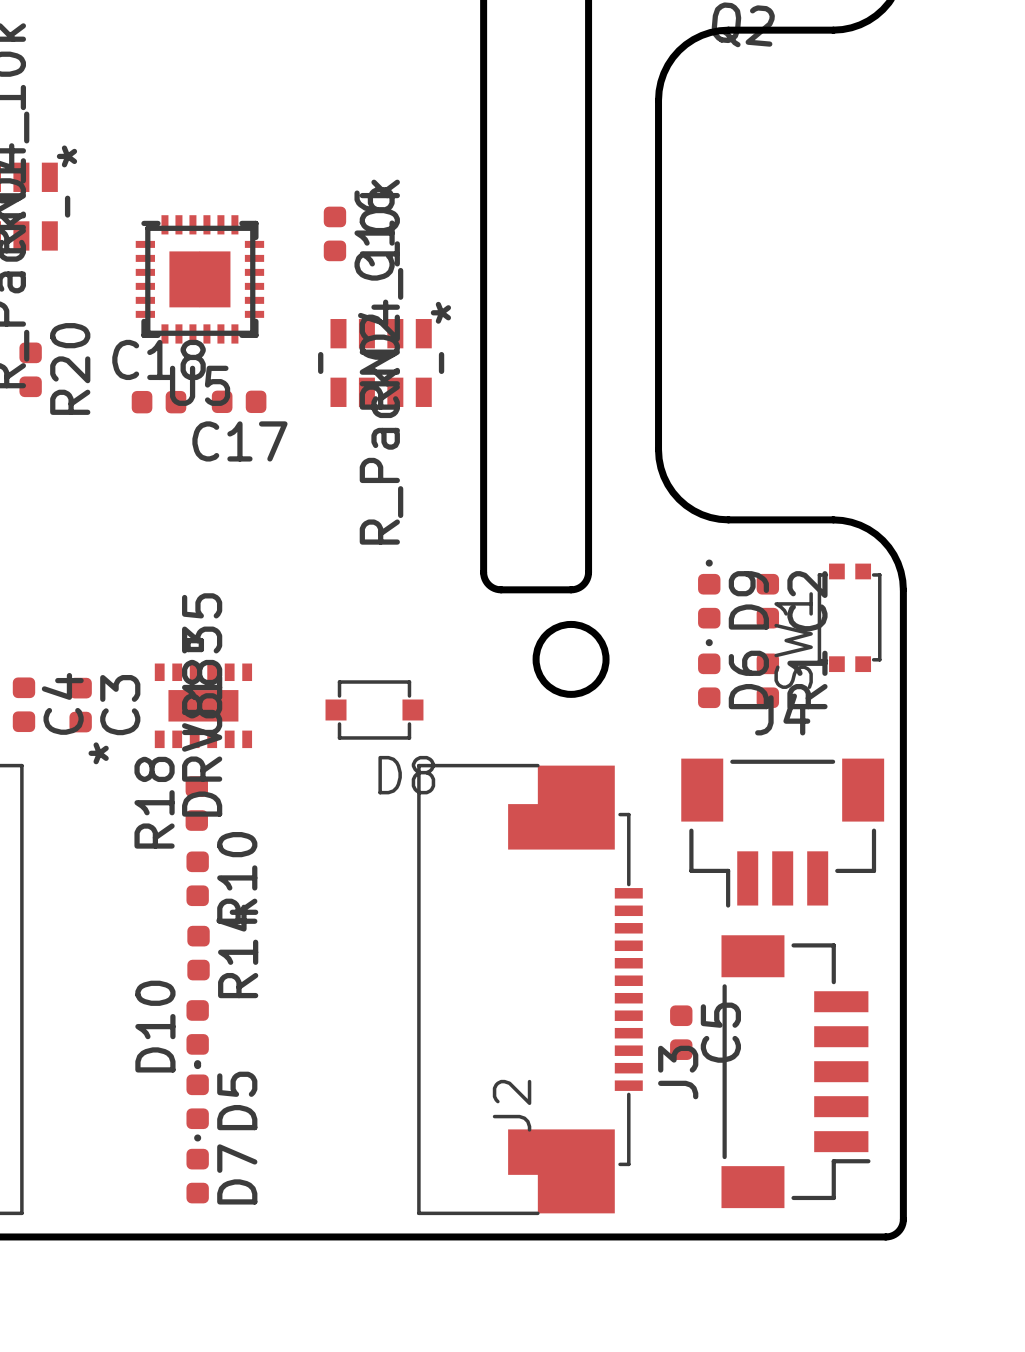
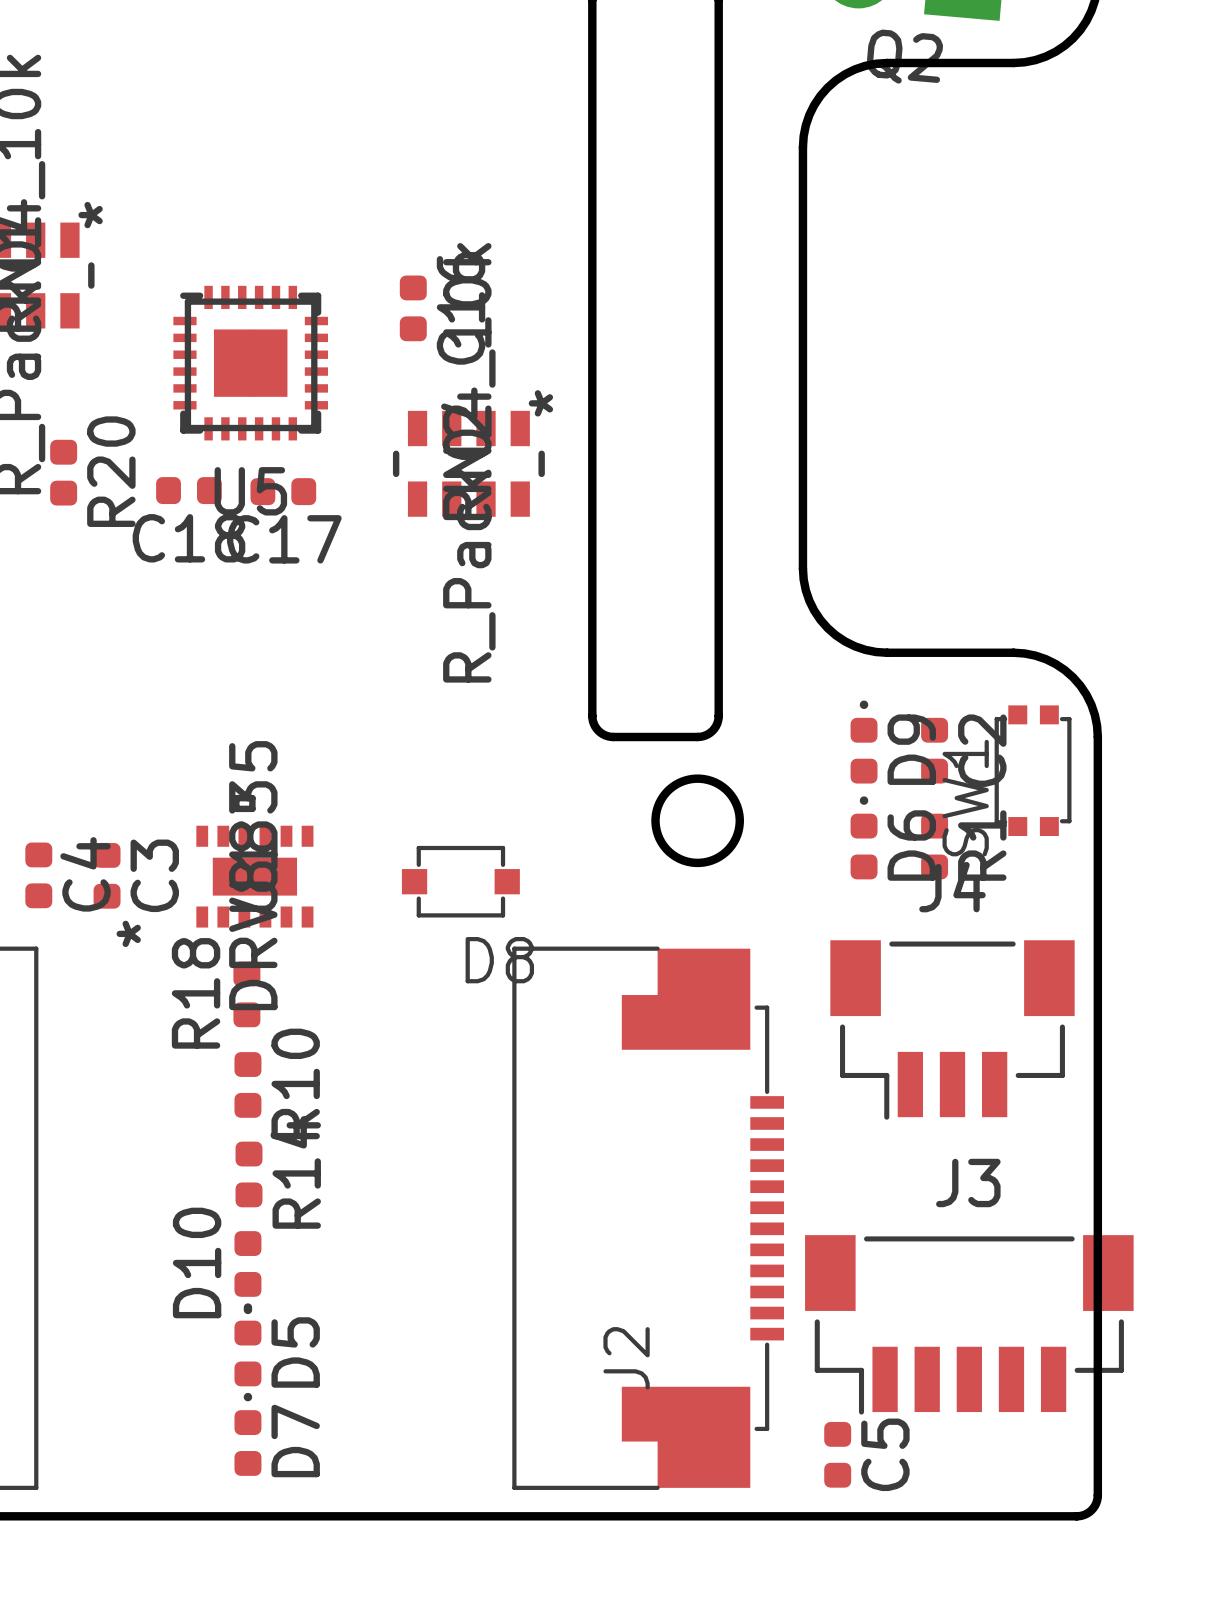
C18 name position: C18 (159, 359) -> C18 (188, 538)
R20 position: (30, 369) -> (63, 472)
C17 position: (239, 401) -> (283, 491)
C18 position: (159, 402) -> (188, 490)
C5 position: (681, 1032) -> (837, 1454)
J3 rotation: 0° (795, 1071) -> 90° clockwise (969, 1324)

